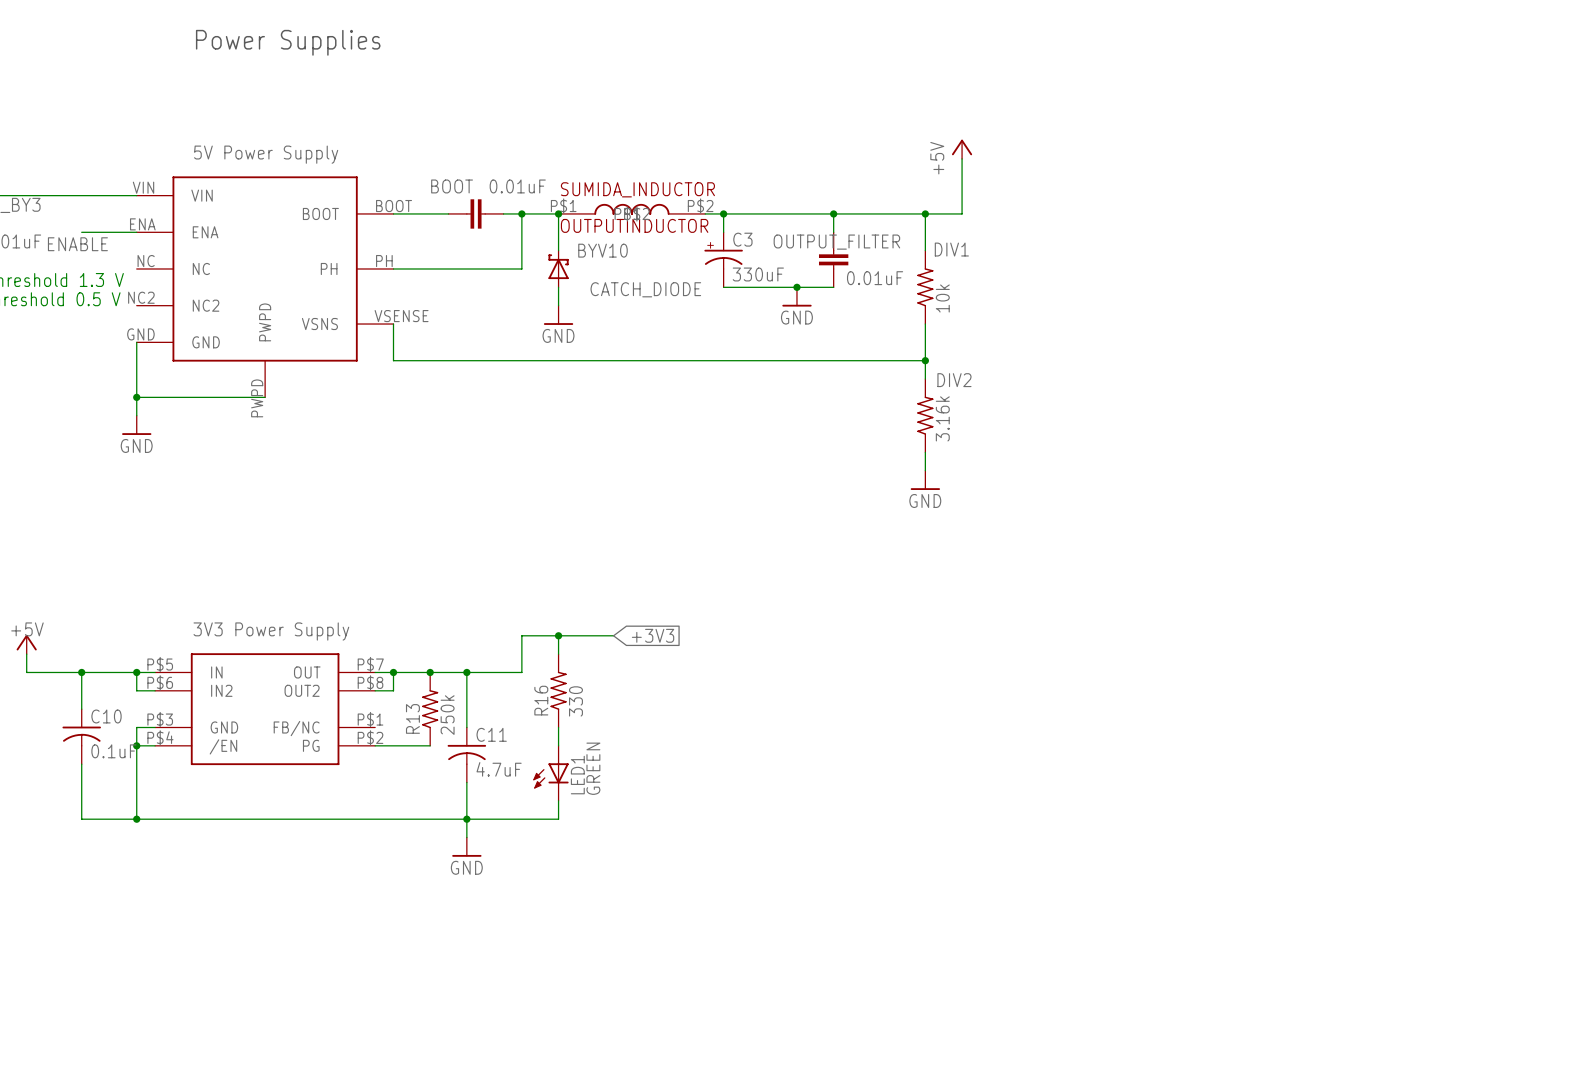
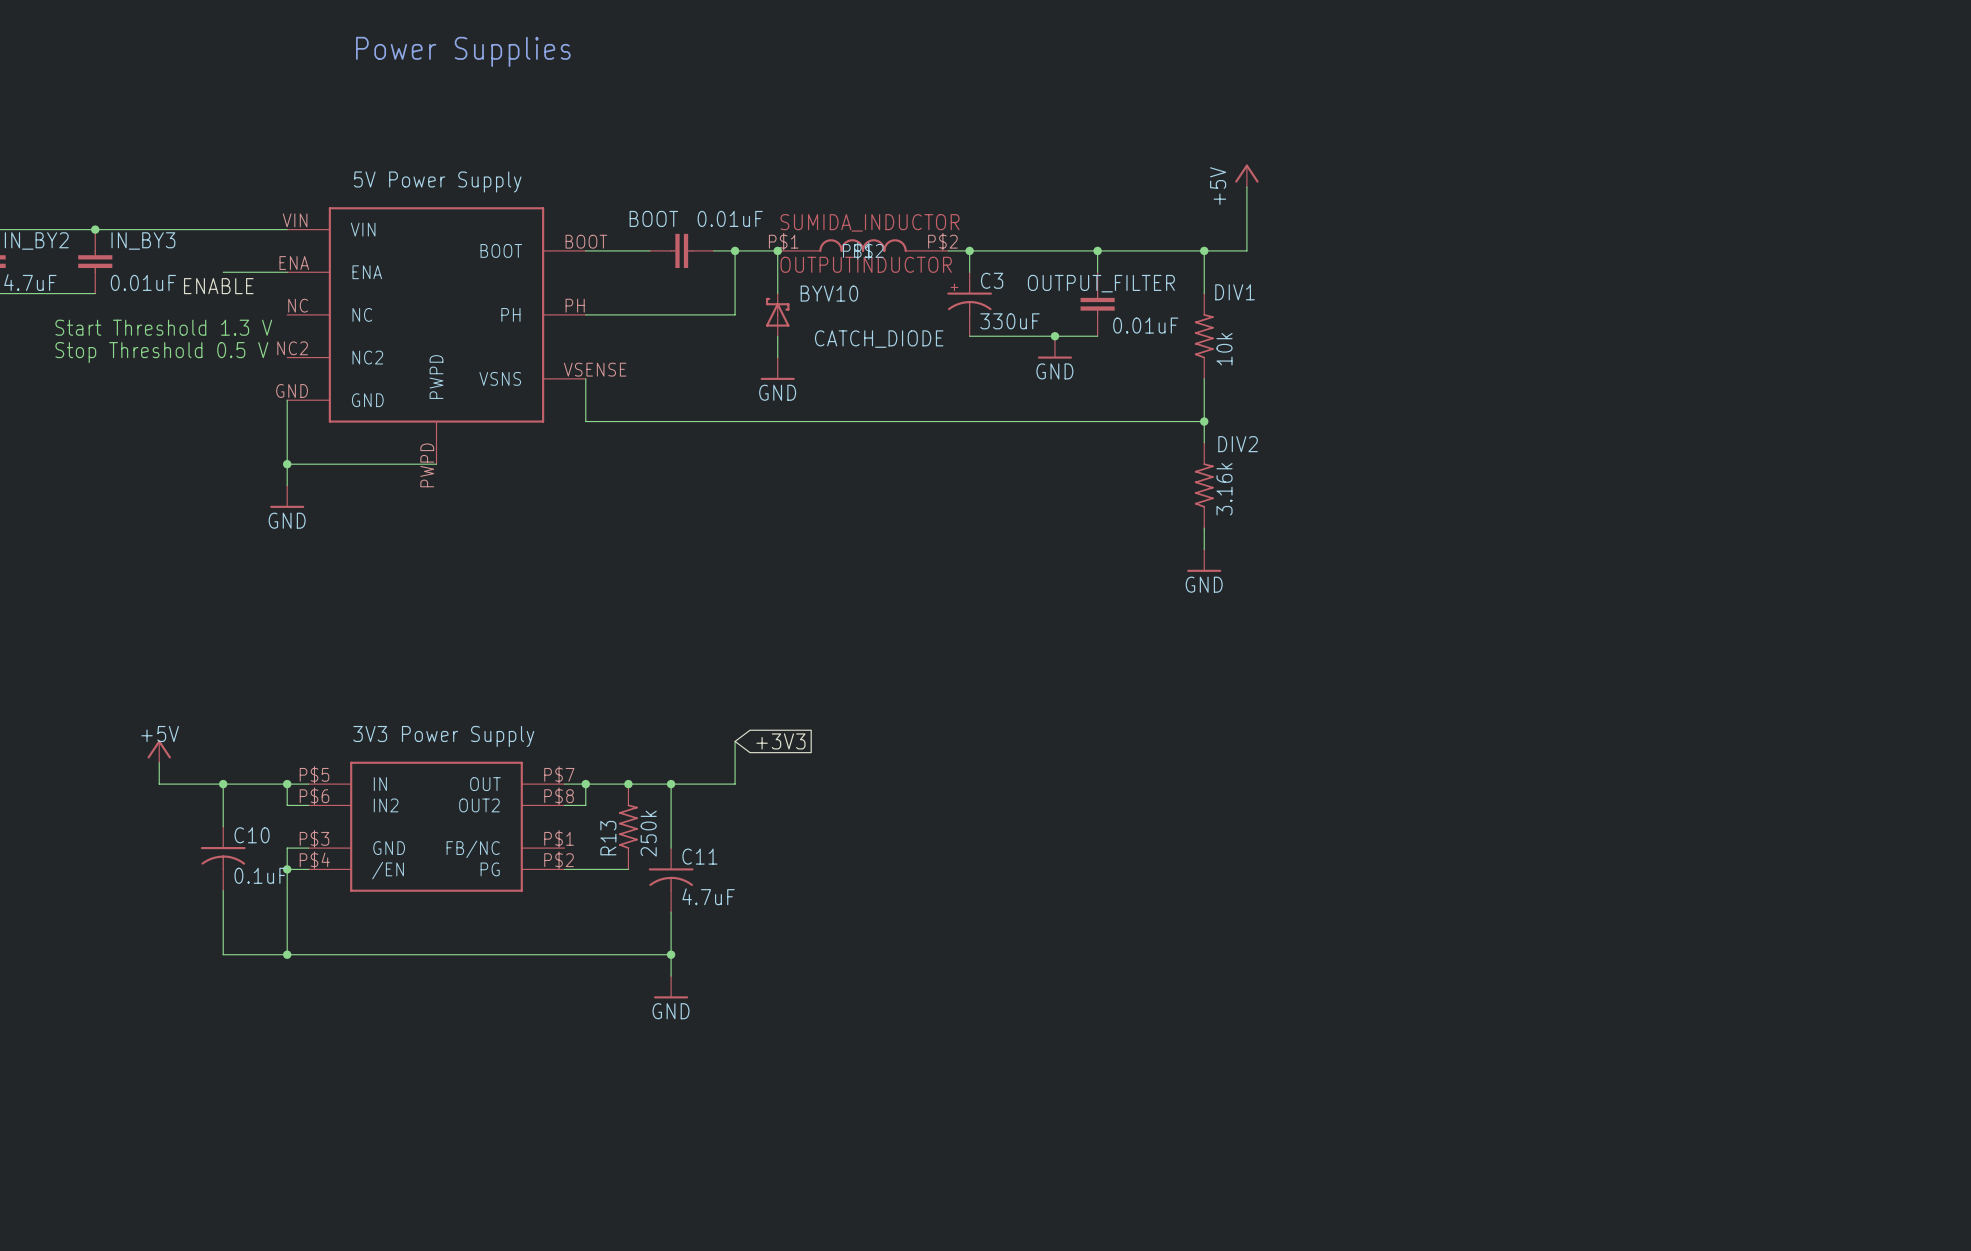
wire: (521, 635) (613, 635) -> none
wire: (558, 635) (558, 654) -> none
junction: (558, 635) -> none
global label position: +3V3 (653, 635) -> +3V3 (780, 741)
R16: 330 (558, 690) -> none
wire: (558, 727) (558, 745) -> none
LED1: GREEN (550, 773) -> none
wire: (558, 800) (558, 819) (466, 819) -> none

